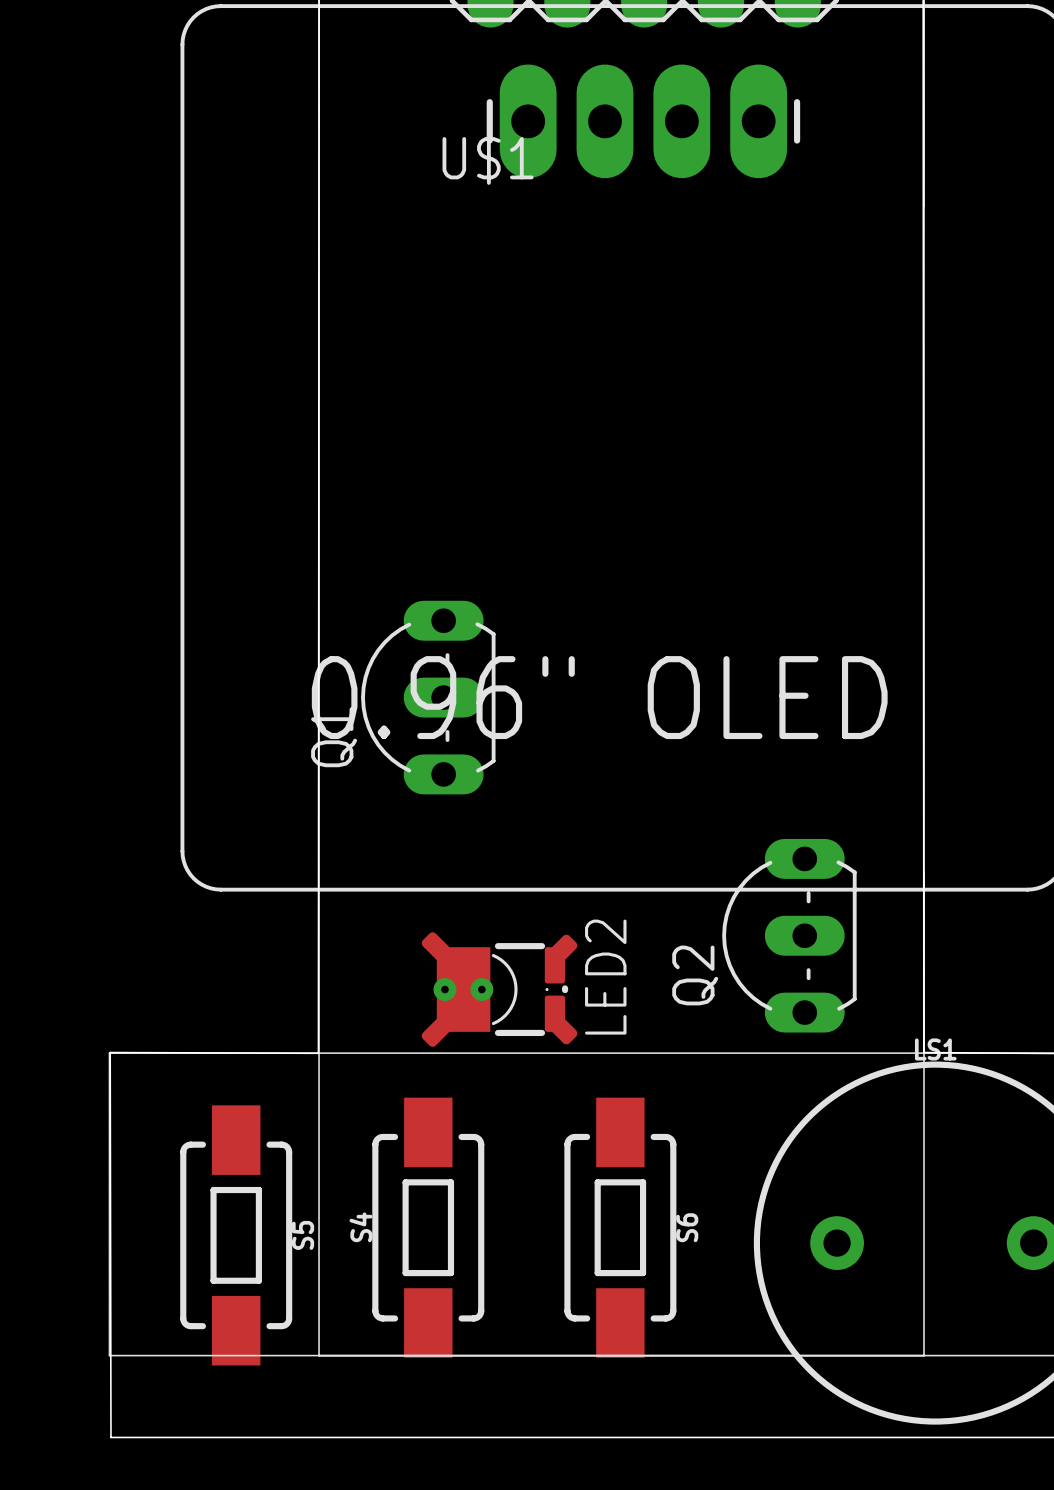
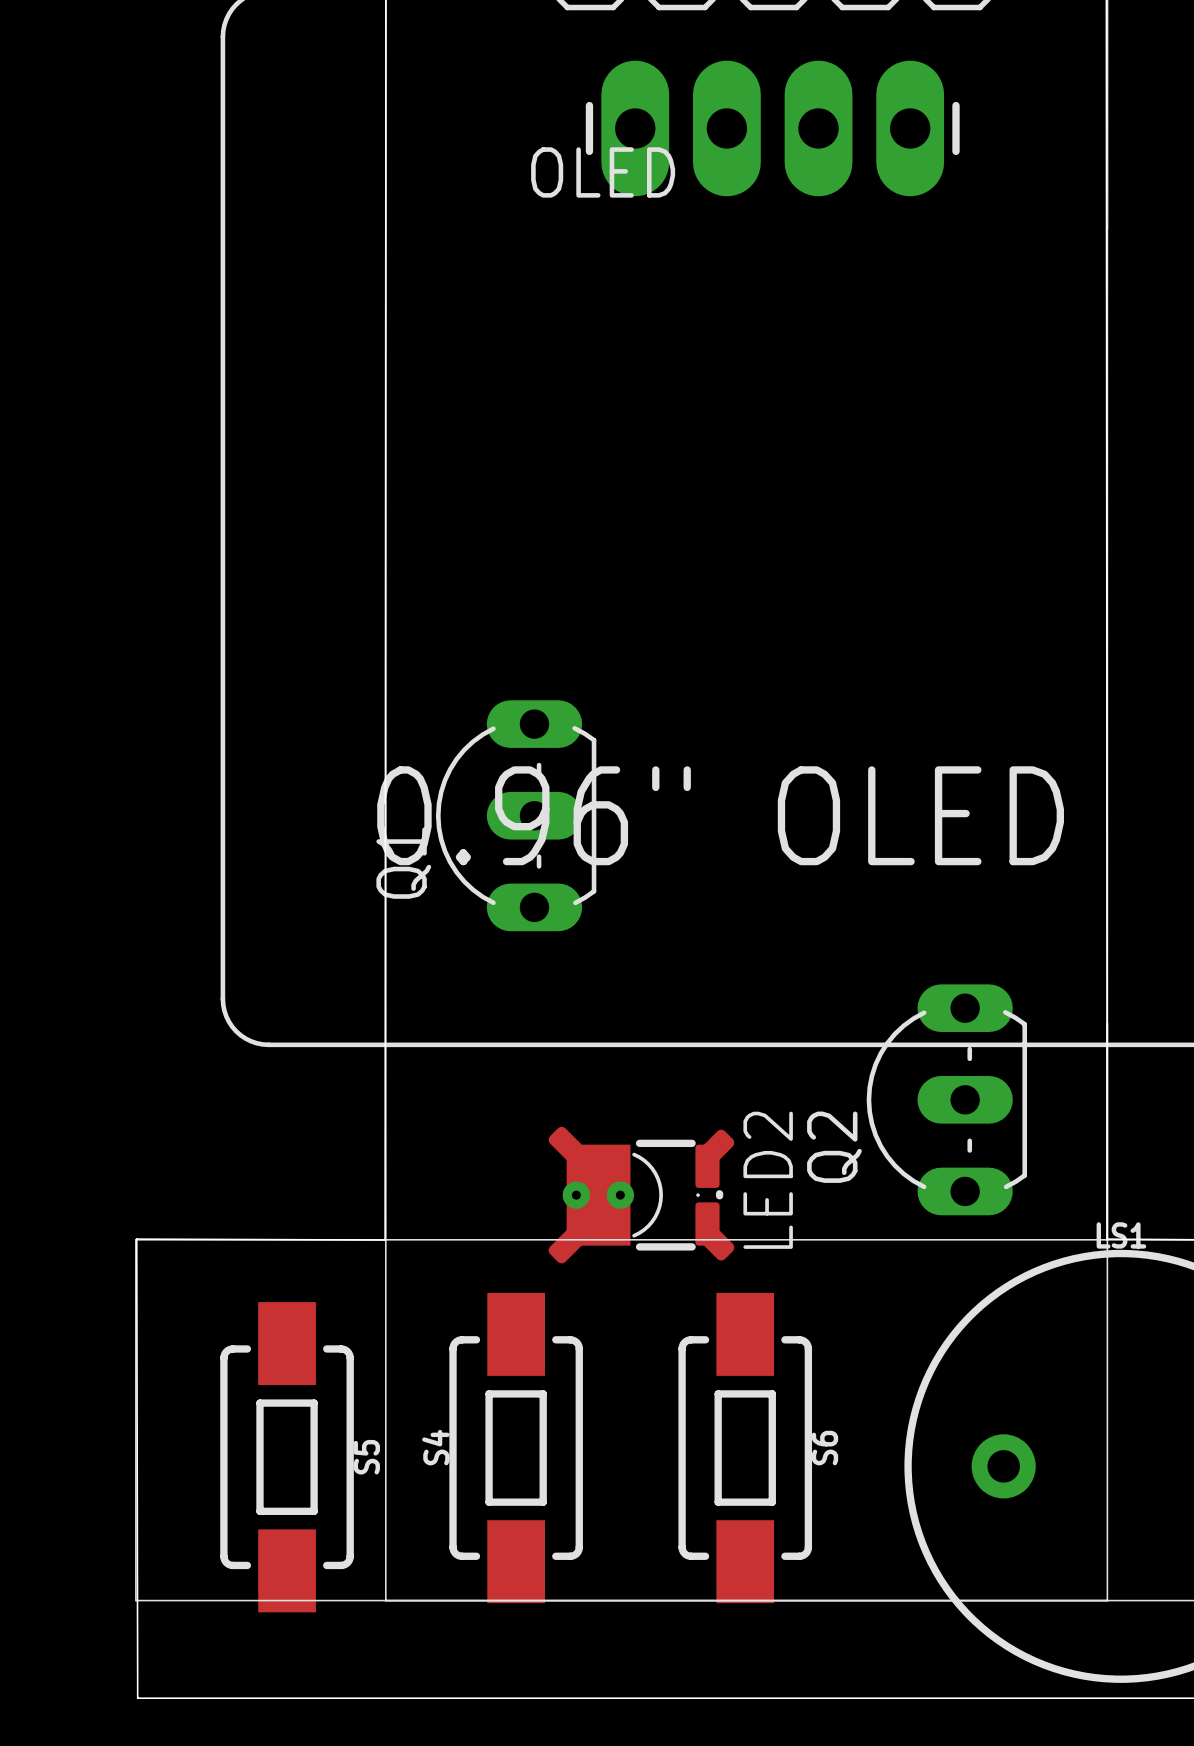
U$1 name: U$1 (488, 158) -> OLED (603, 172)
LED2 position: (499, 989) -> (641, 1195)

